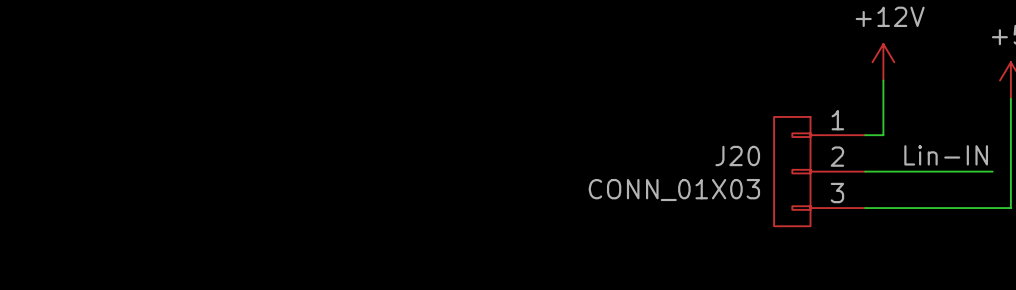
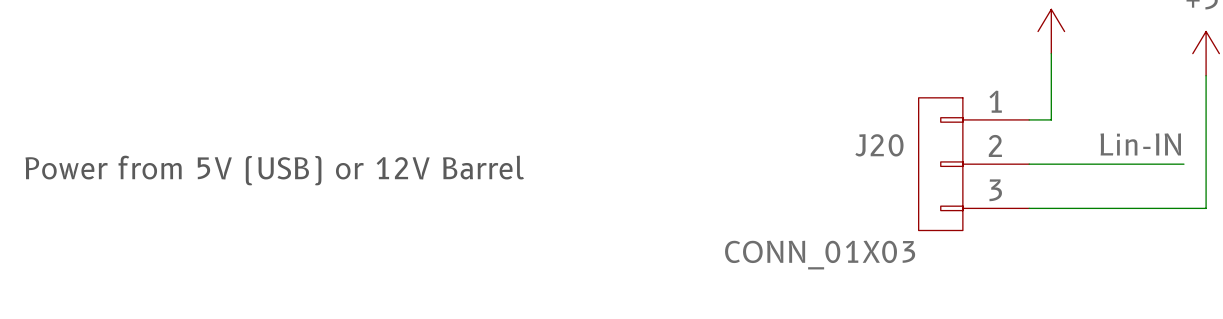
text: none -> Power from 5V (USB) or 12V Barrel (274, 170)
J20 value position: CONN_01X03 (674, 190) -> CONN_01X03 (820, 255)

